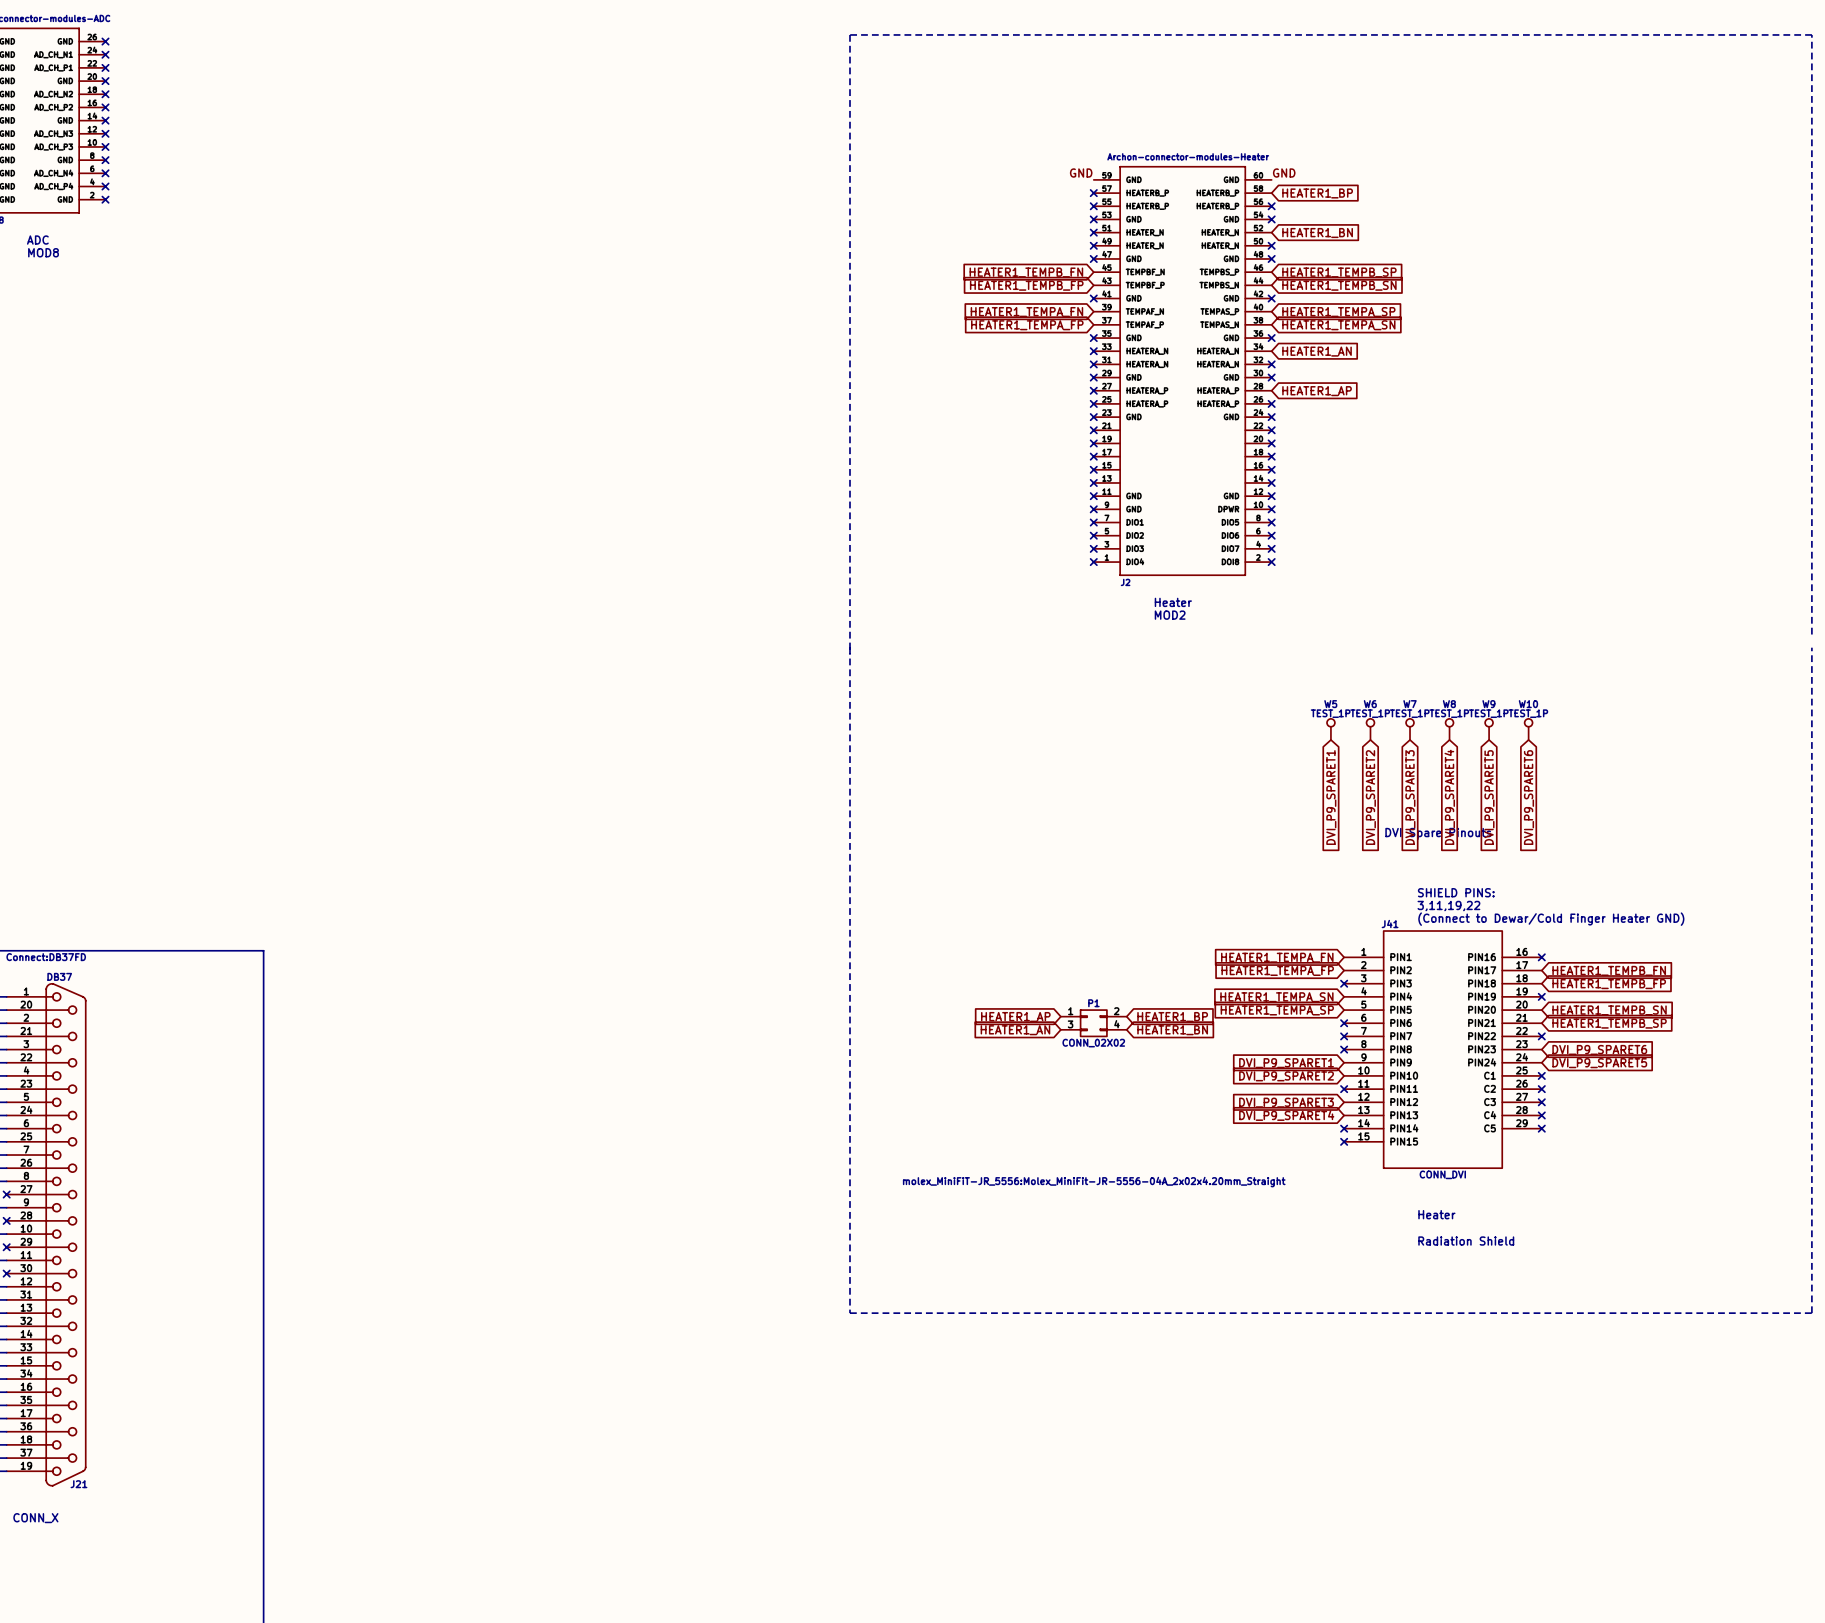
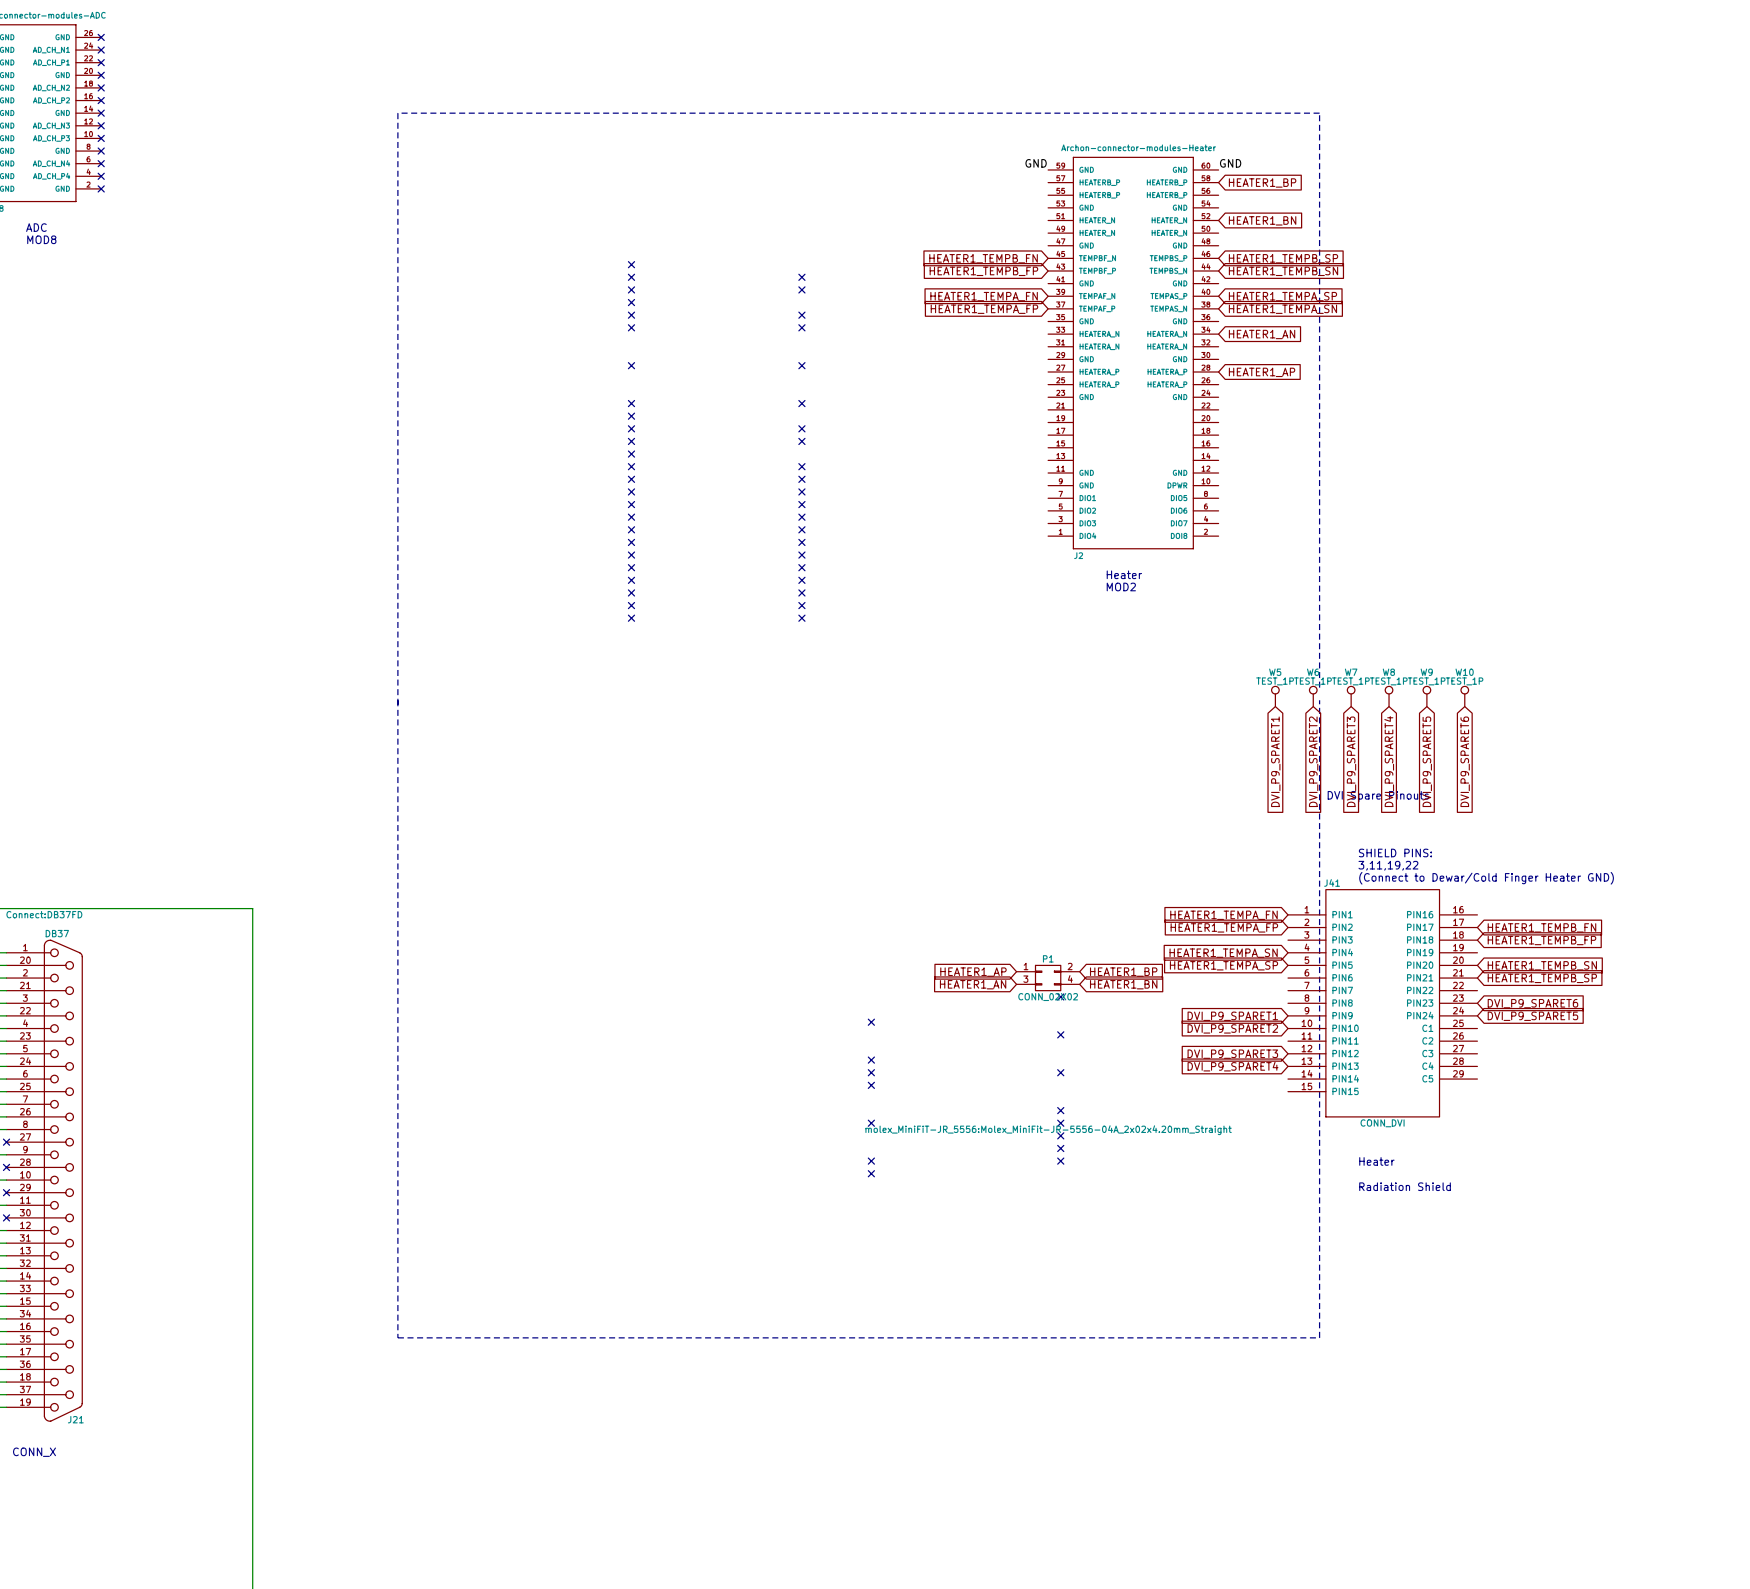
no-connect mark: (1093, 193) -> none
no-connect mark: (1093, 206) -> none
no-connect mark: (1271, 206) -> none
no-connect mark: (1093, 219) -> none
no-connect mark: (1271, 219) -> none
no-connect mark: (1093, 232) -> none
no-connect mark: (1093, 245) -> none
no-connect mark: (1271, 245) -> none
no-connect mark: (1093, 258) -> none
no-connect mark: (1271, 258) -> none
no-connect mark: none -> (631, 264)
no-connect mark: none -> (631, 277)
no-connect mark: none -> (801, 277)
no-connect mark: (1093, 298) -> none
no-connect mark: (1271, 298) -> none
no-connect mark: none -> (631, 289)
no-connect mark: none -> (801, 289)
no-connect mark: none -> (631, 302)
no-connect mark: none -> (631, 315)
no-connect mark: none -> (801, 315)
no-connect mark: (1093, 338) -> none
no-connect mark: (1271, 338) -> none
no-connect mark: none -> (631, 327)
no-connect mark: none -> (801, 327)
no-connect mark: (1093, 351) -> none
no-connect mark: (1093, 364) -> none
no-connect mark: (1271, 364) -> none
no-connect mark: (1093, 377) -> none
no-connect mark: (1271, 377) -> none
no-connect mark: none -> (631, 365)
no-connect mark: none -> (801, 365)
no-connect mark: (1093, 390) -> none
no-connect mark: (1093, 403) -> none
no-connect mark: (1271, 403) -> none
no-connect mark: (1093, 417) -> none
no-connect mark: (1271, 417) -> none
no-connect mark: none -> (631, 403)
no-connect mark: none -> (801, 403)
no-connect mark: (1093, 430) -> none
no-connect mark: (1271, 430) -> none
no-connect mark: none -> (631, 416)
no-connect mark: (1093, 443) -> none
no-connect mark: (1271, 443) -> none
no-connect mark: none -> (631, 428)
no-connect mark: none -> (801, 428)
no-connect mark: (1093, 456) -> none
no-connect mark: (1271, 456) -> none
no-connect mark: none -> (631, 441)
no-connect mark: none -> (801, 441)
no-connect mark: (1093, 469) -> none
no-connect mark: (1271, 469) -> none
no-connect mark: none -> (631, 454)
no-connect mark: (1093, 482) -> none
no-connect mark: (1271, 482) -> none
no-connect mark: none -> (631, 466)
no-connect mark: none -> (801, 466)
no-connect mark: (1093, 496) -> none
no-connect mark: (1271, 496) -> none
no-connect mark: none -> (631, 479)
no-connect mark: none -> (801, 479)
no-connect mark: (1093, 509) -> none
no-connect mark: (1271, 509) -> none
no-connect mark: none -> (631, 491)
no-connect mark: none -> (801, 491)
no-connect mark: (1093, 522) -> none
no-connect mark: (1271, 522) -> none
no-connect mark: none -> (631, 504)
no-connect mark: none -> (801, 504)
no-connect mark: (1093, 535) -> none
no-connect mark: (1271, 535) -> none
no-connect mark: none -> (631, 517)
no-connect mark: none -> (801, 517)
no-connect mark: (1093, 548) -> none
no-connect mark: (1271, 548) -> none
no-connect mark: none -> (631, 529)
no-connect mark: none -> (801, 529)
no-connect mark: (1093, 562) -> none
no-connect mark: (1271, 562) -> none
no-connect mark: none -> (631, 542)
no-connect mark: none -> (801, 542)
no-connect mark: none -> (631, 555)
no-connect mark: none -> (801, 555)
no-connect mark: none -> (631, 567)
no-connect mark: none -> (801, 567)
no-connect mark: none -> (631, 580)
no-connect mark: none -> (801, 580)
no-connect mark: none -> (631, 592)
no-connect mark: none -> (801, 592)
no-connect mark: none -> (631, 605)
no-connect mark: none -> (801, 605)
line: (1811, 634) (1811, 34) (849, 34) (849, 1313) (1811, 1313) (1811, 647) -> none
no-connect mark: none -> (631, 618)
no-connect mark: none -> (801, 618)
line: none -> (1319, 687) (1319, 113) (397, 113) (397, 1337) (1319, 1337) (1319, 700)
no-connect mark: (1541, 957) -> none
no-connect mark: (1344, 983) -> none
no-connect mark: (1541, 996) -> none
no-connect mark: (1344, 1023) -> none
no-connect mark: (1344, 1036) -> none
no-connect mark: (1541, 1036) -> none
no-connect mark: none -> (1060, 996)
no-connect mark: (1344, 1049) -> none
no-connect mark: none -> (871, 1022)
no-connect mark: (1541, 1075) -> none
no-connect mark: none -> (1060, 1034)
no-connect mark: (1344, 1089) -> none
no-connect mark: (1541, 1089) -> none
no-connect mark: (1541, 1102) -> none
no-connect mark: none -> (871, 1060)
no-connect mark: (1541, 1115) -> none
no-connect mark: none -> (871, 1072)
no-connect mark: none -> (1060, 1072)
no-connect mark: (1344, 1128) -> none
no-connect mark: (1541, 1128) -> none
no-connect mark: none -> (871, 1085)
no-connect mark: (1344, 1141) -> none
no-connect mark: none -> (1060, 1110)
no-connect mark: none -> (871, 1123)
no-connect mark: none -> (1060, 1123)
no-connect mark: none -> (1060, 1135)
no-connect mark: none -> (1060, 1148)
no-connect mark: none -> (871, 1161)
no-connect mark: none -> (1060, 1161)
no-connect mark: none -> (871, 1173)

